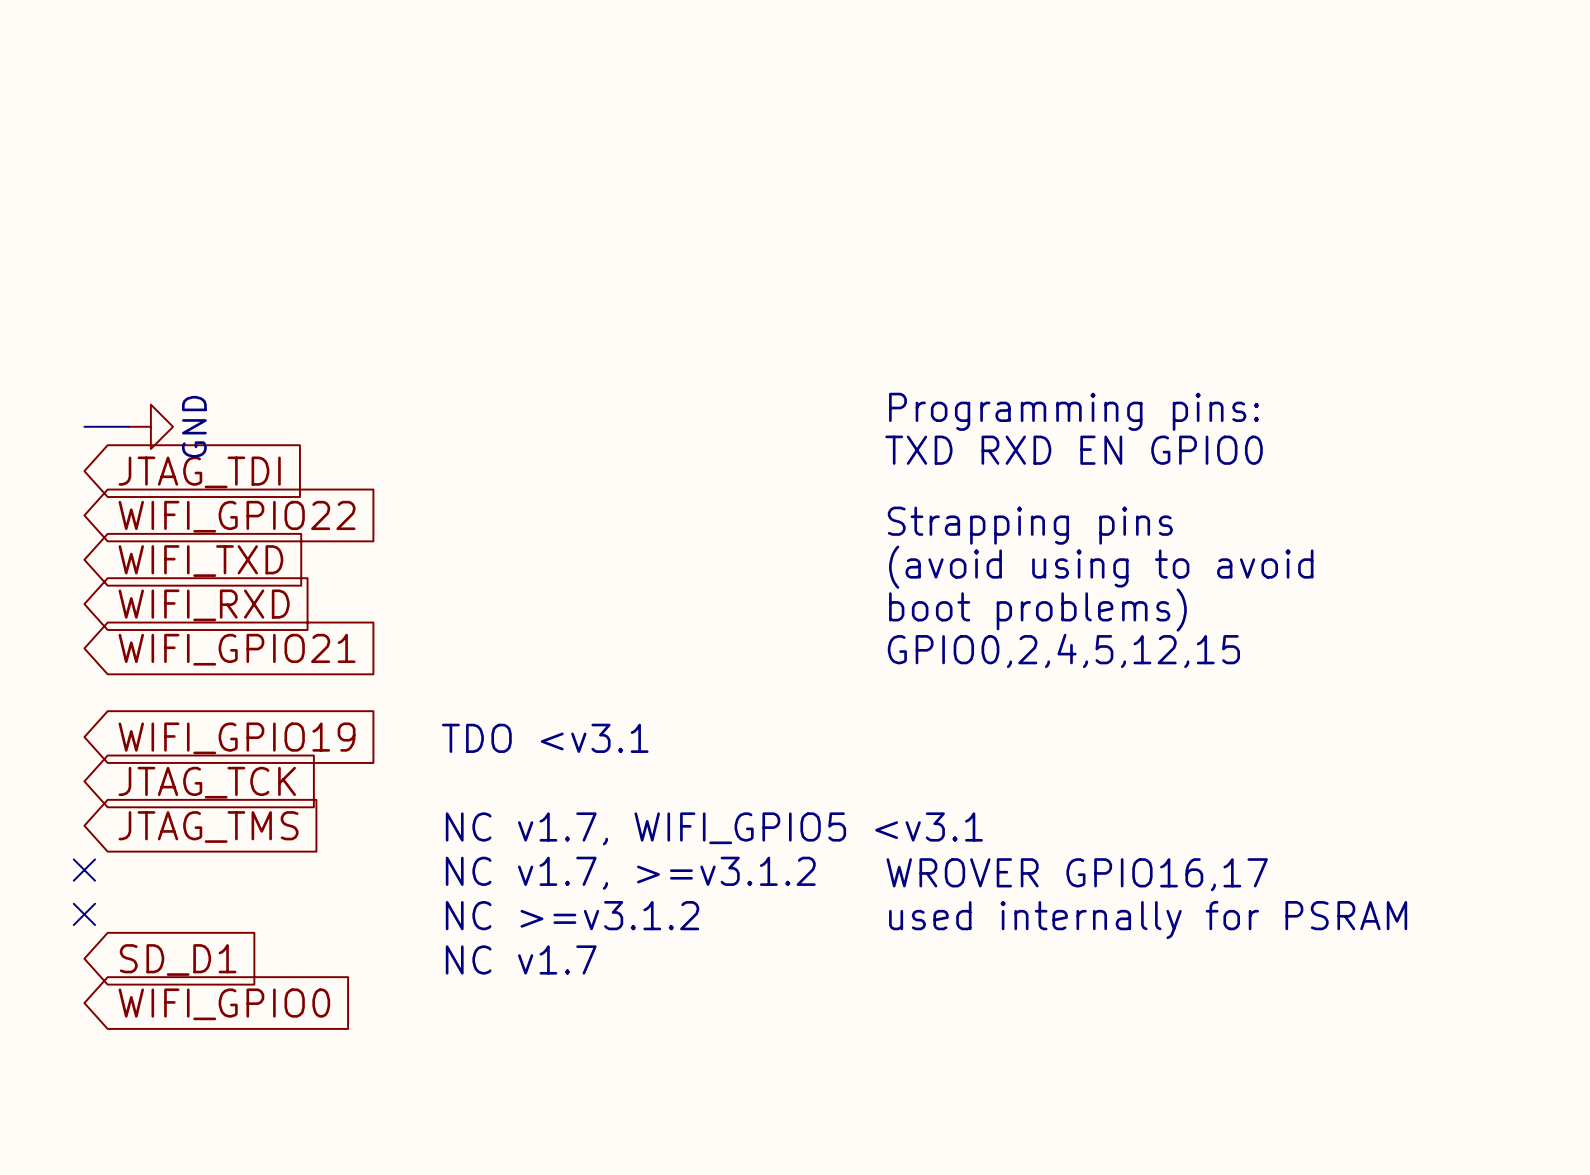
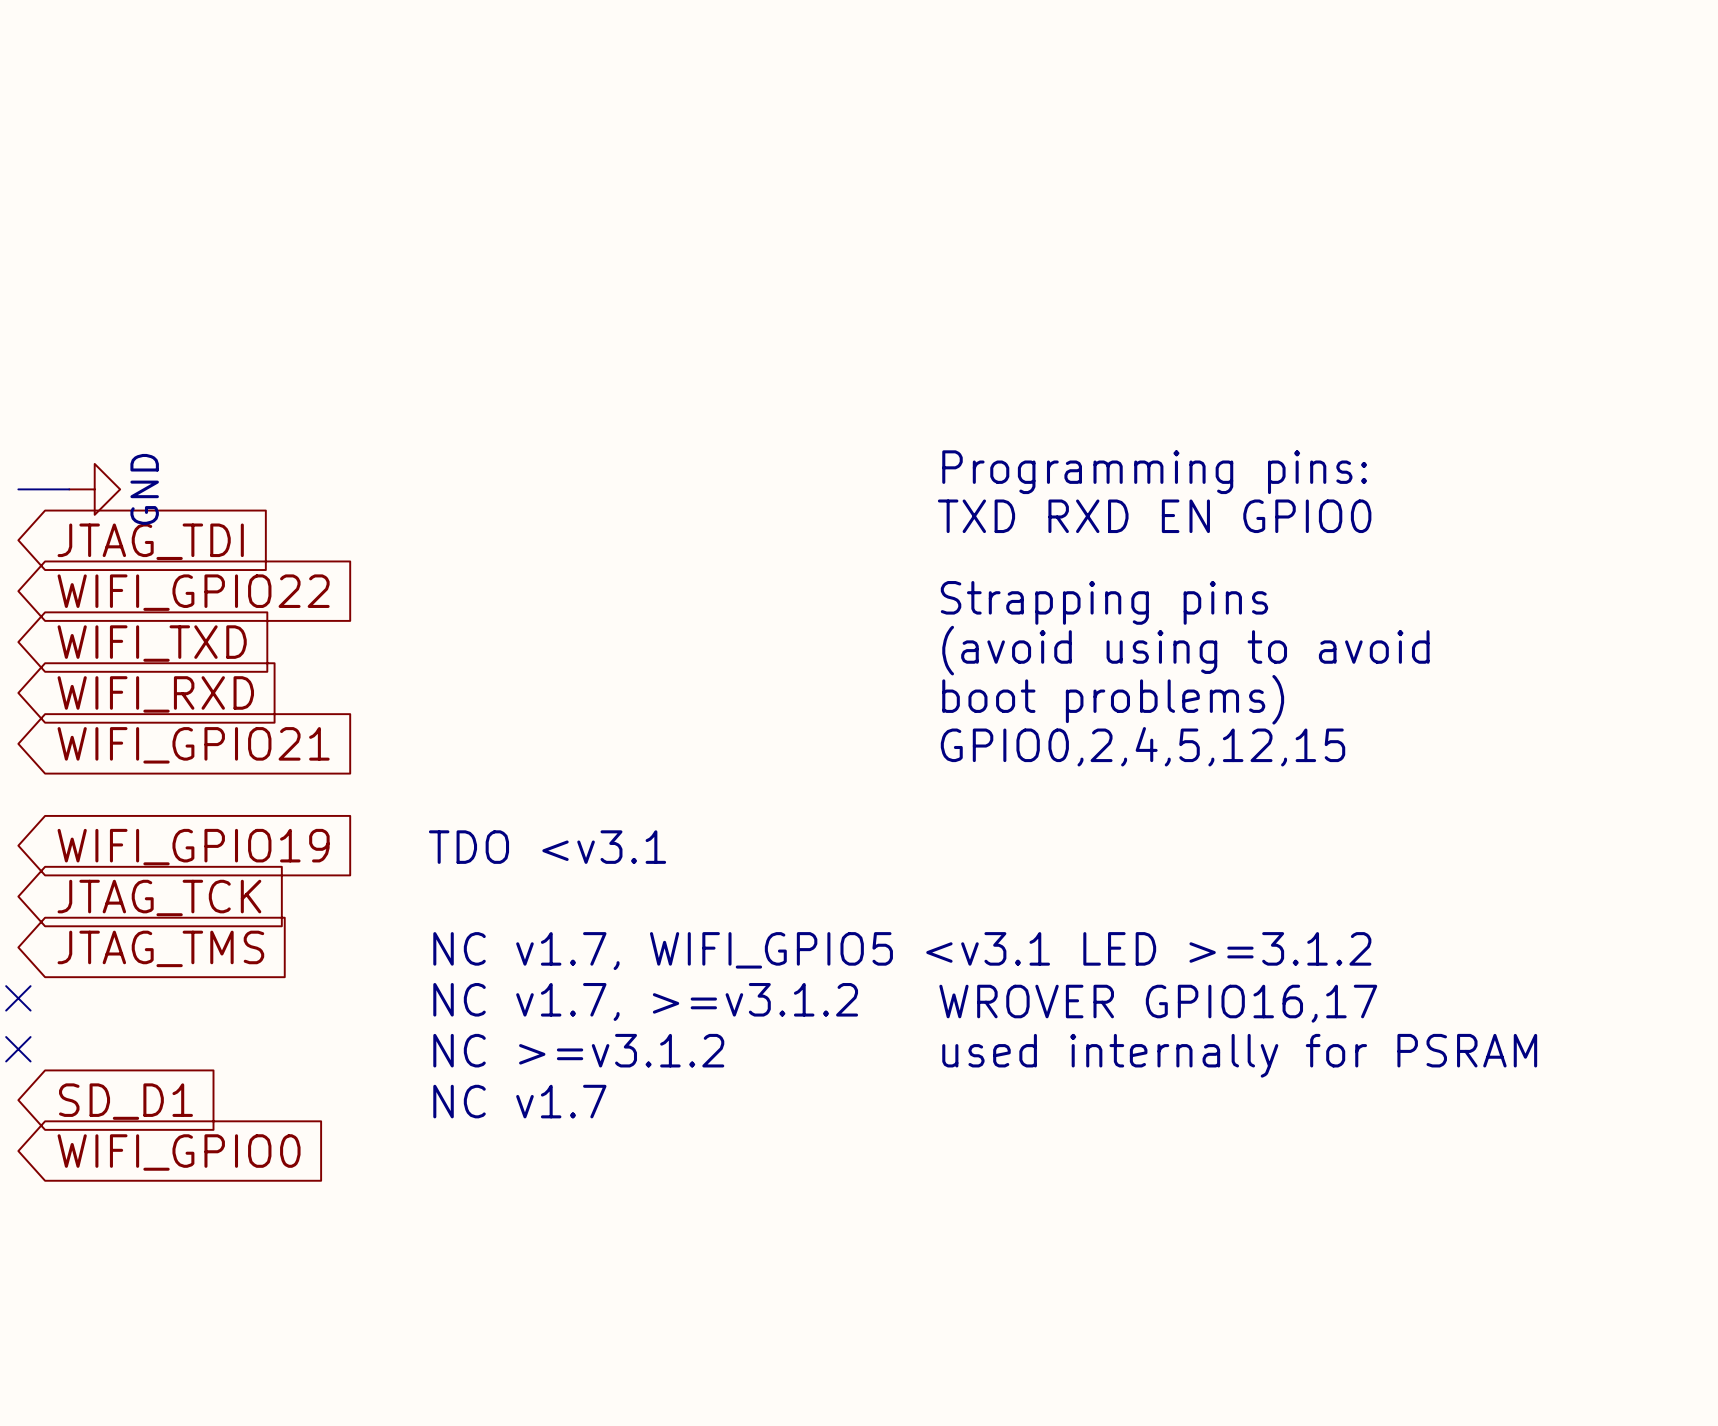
text: NC v1.7, WIFI_GPIO5 <v3.1 (714, 828) -> NC v1.7, WIFI_GPIO5 <v3.1 LED >=3.1.2 (902, 951)

